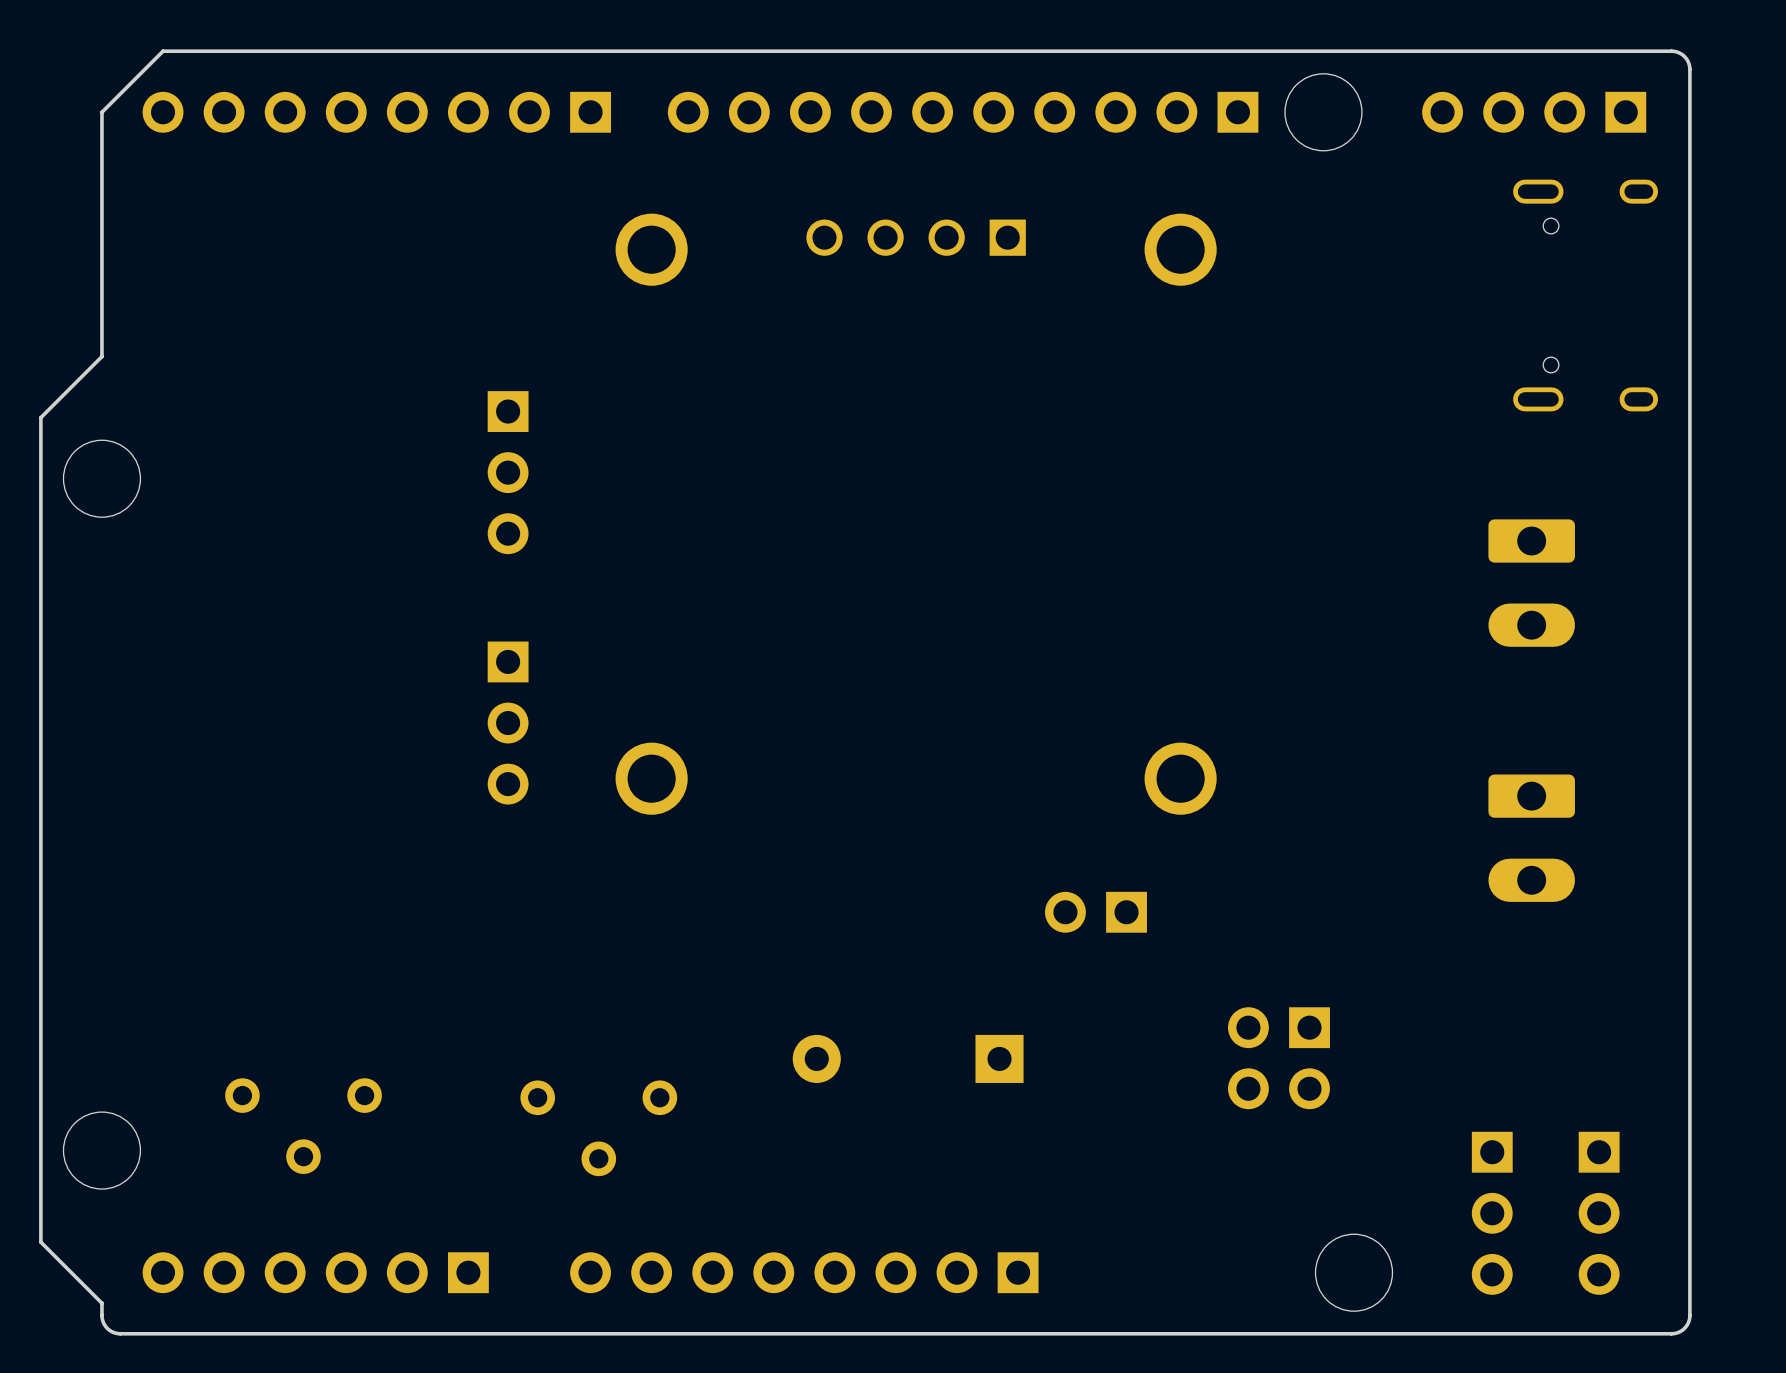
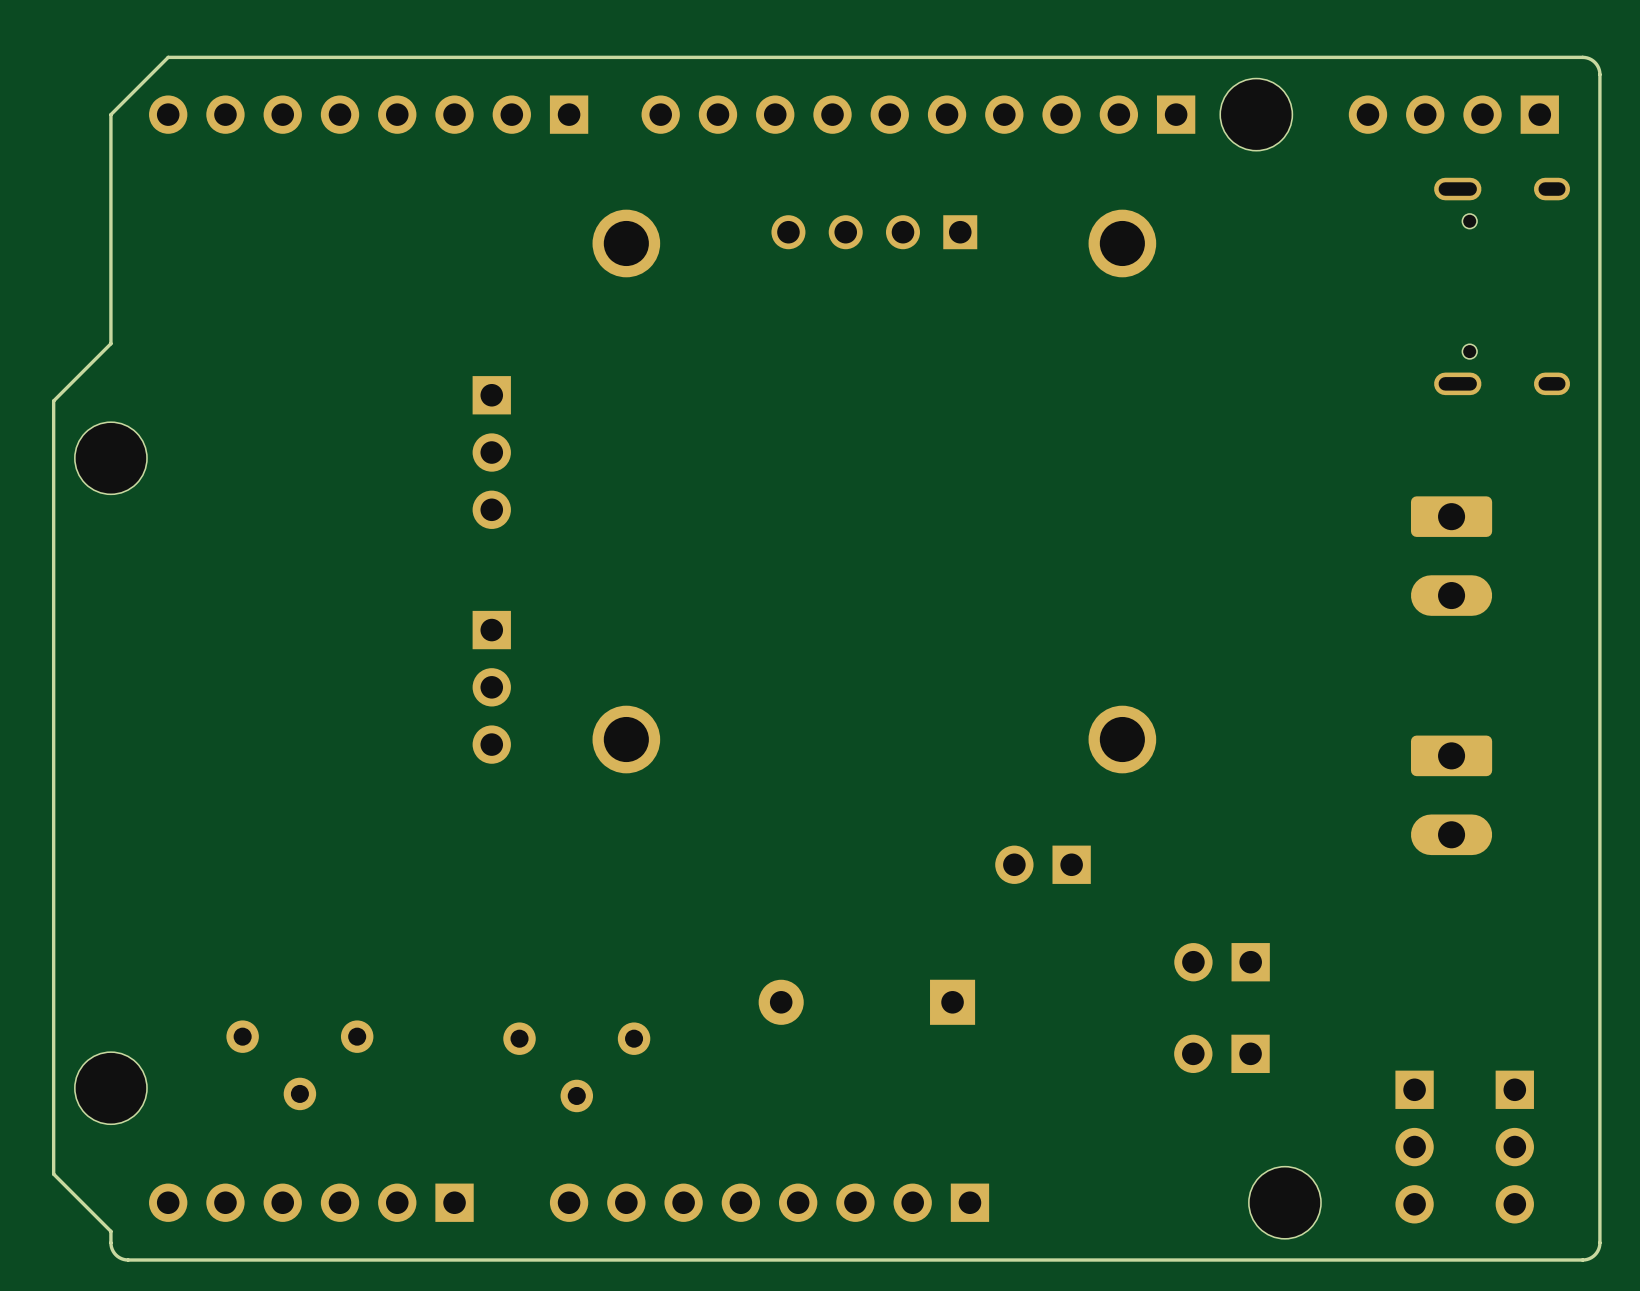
part: none -> (1222, 962)
part: (1278, 1058) -> none
part: none -> (1221, 1053)

